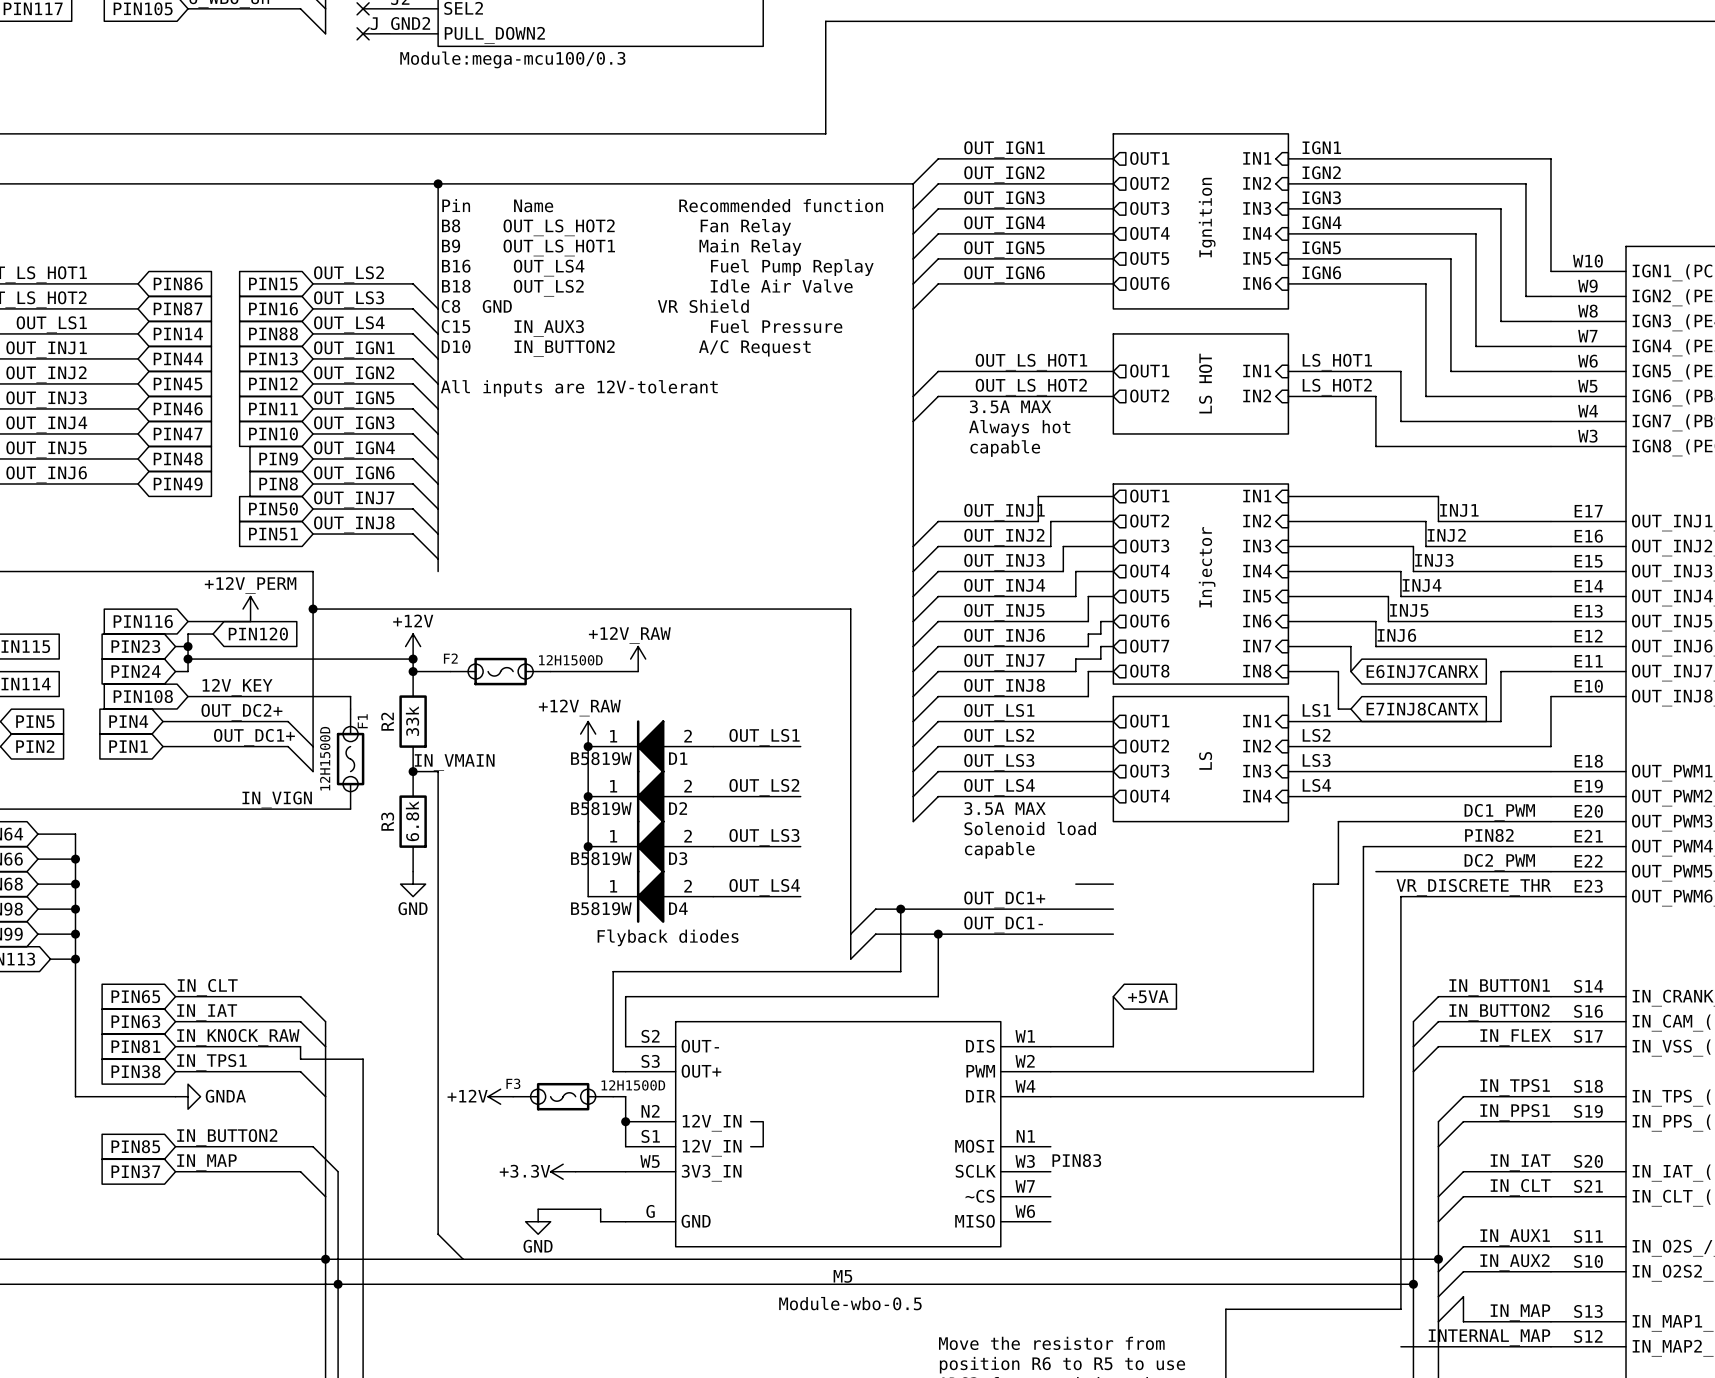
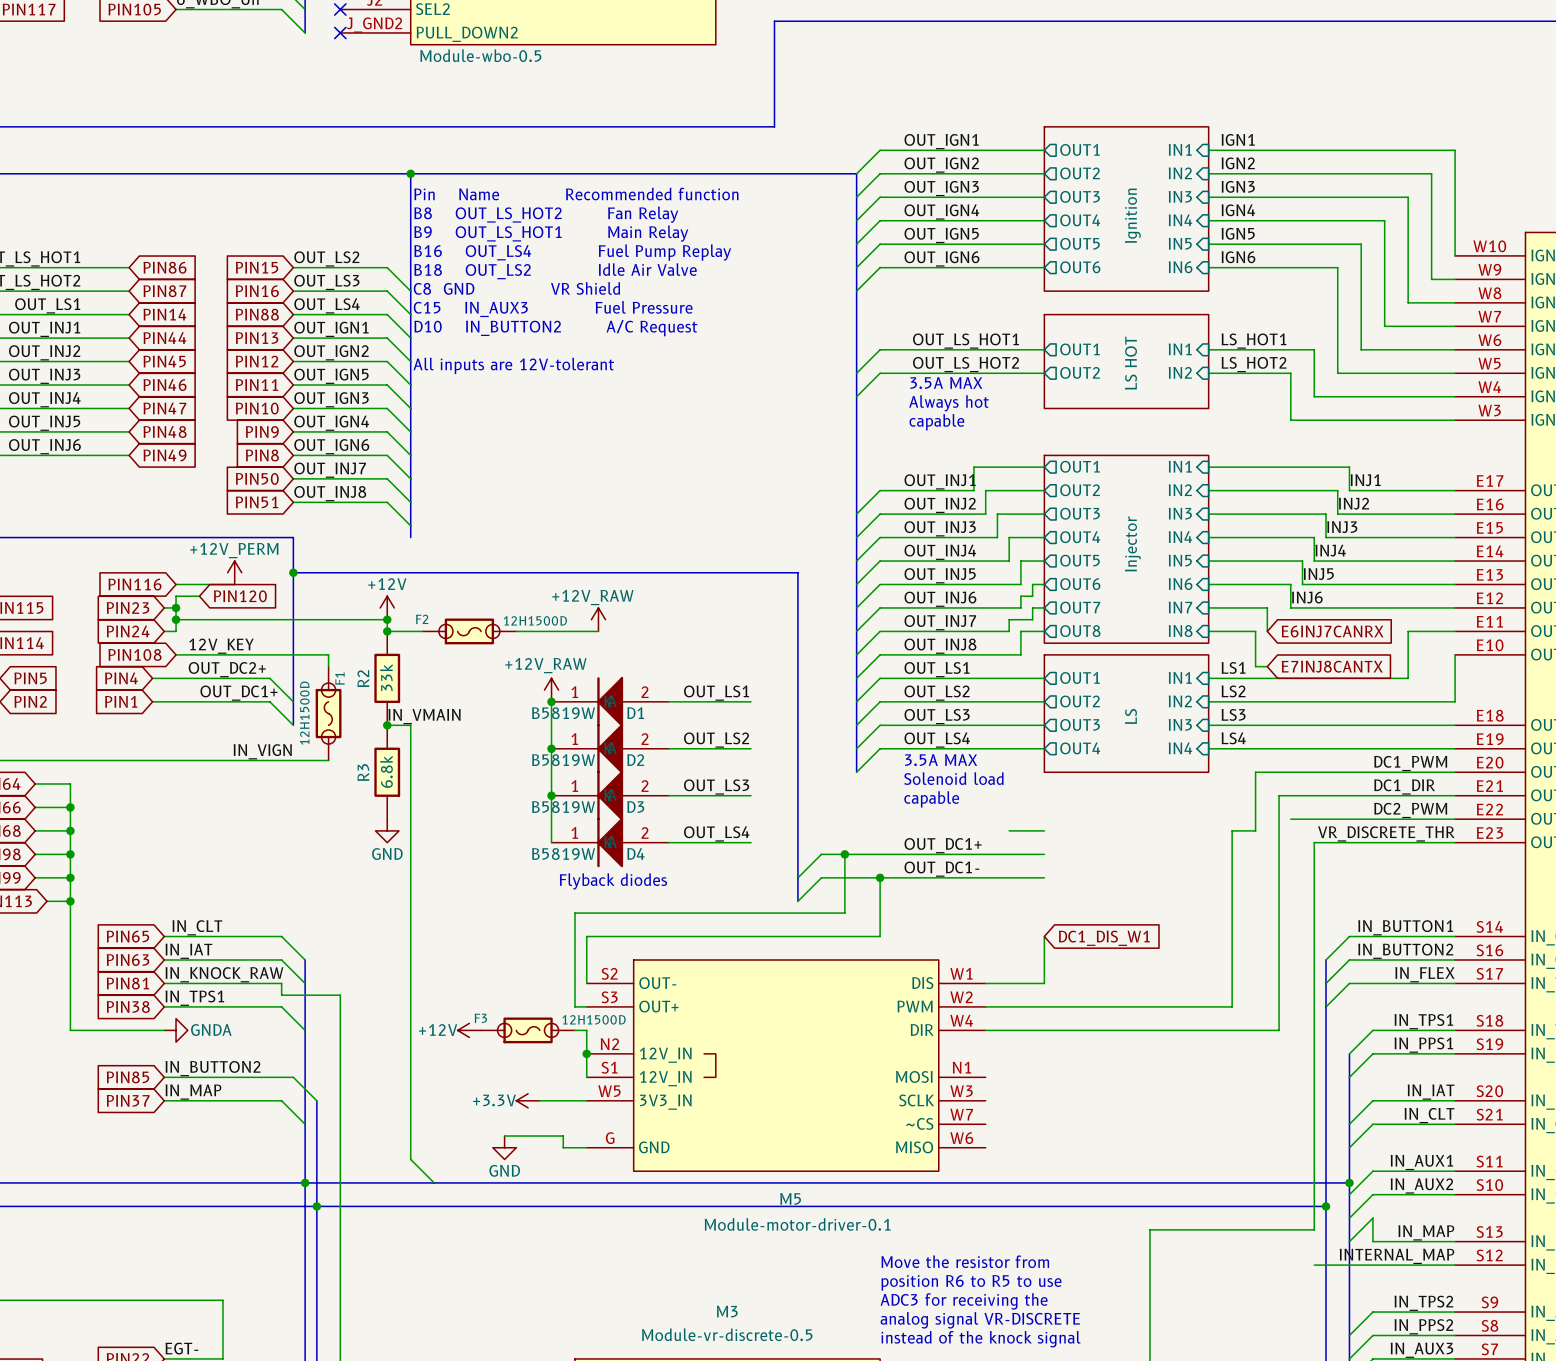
part value: Module:mega-mcu100/0.3 (512, 59) -> Module-wbo-0.5 (480, 55)
label: PIN82 (1489, 835) -> DC1_DIR (1404, 787)
global label: +5VA (1148, 996) -> DC1_DIS_W1 (1104, 938)
label: PIN83 (1076, 1160) -> none
M5 value: Module-wbo-0.5 (850, 1303) -> Module-motor-driver-0.1 (797, 1224)

